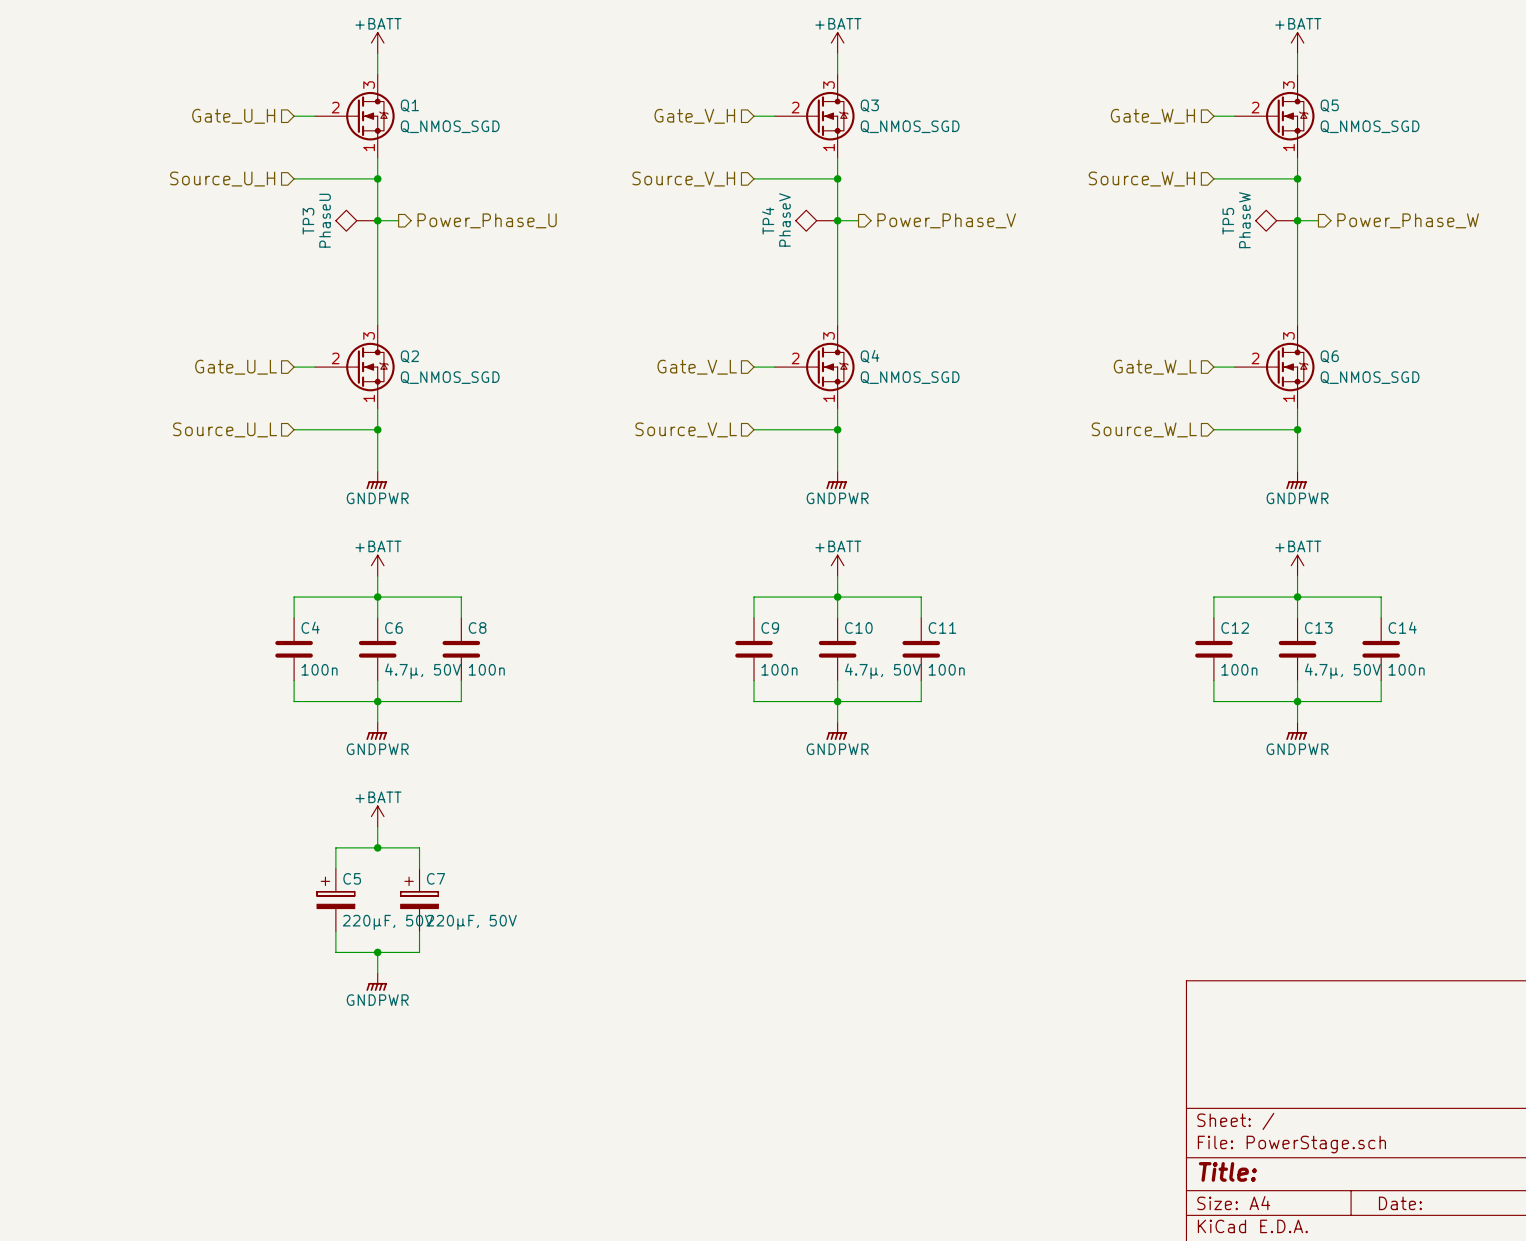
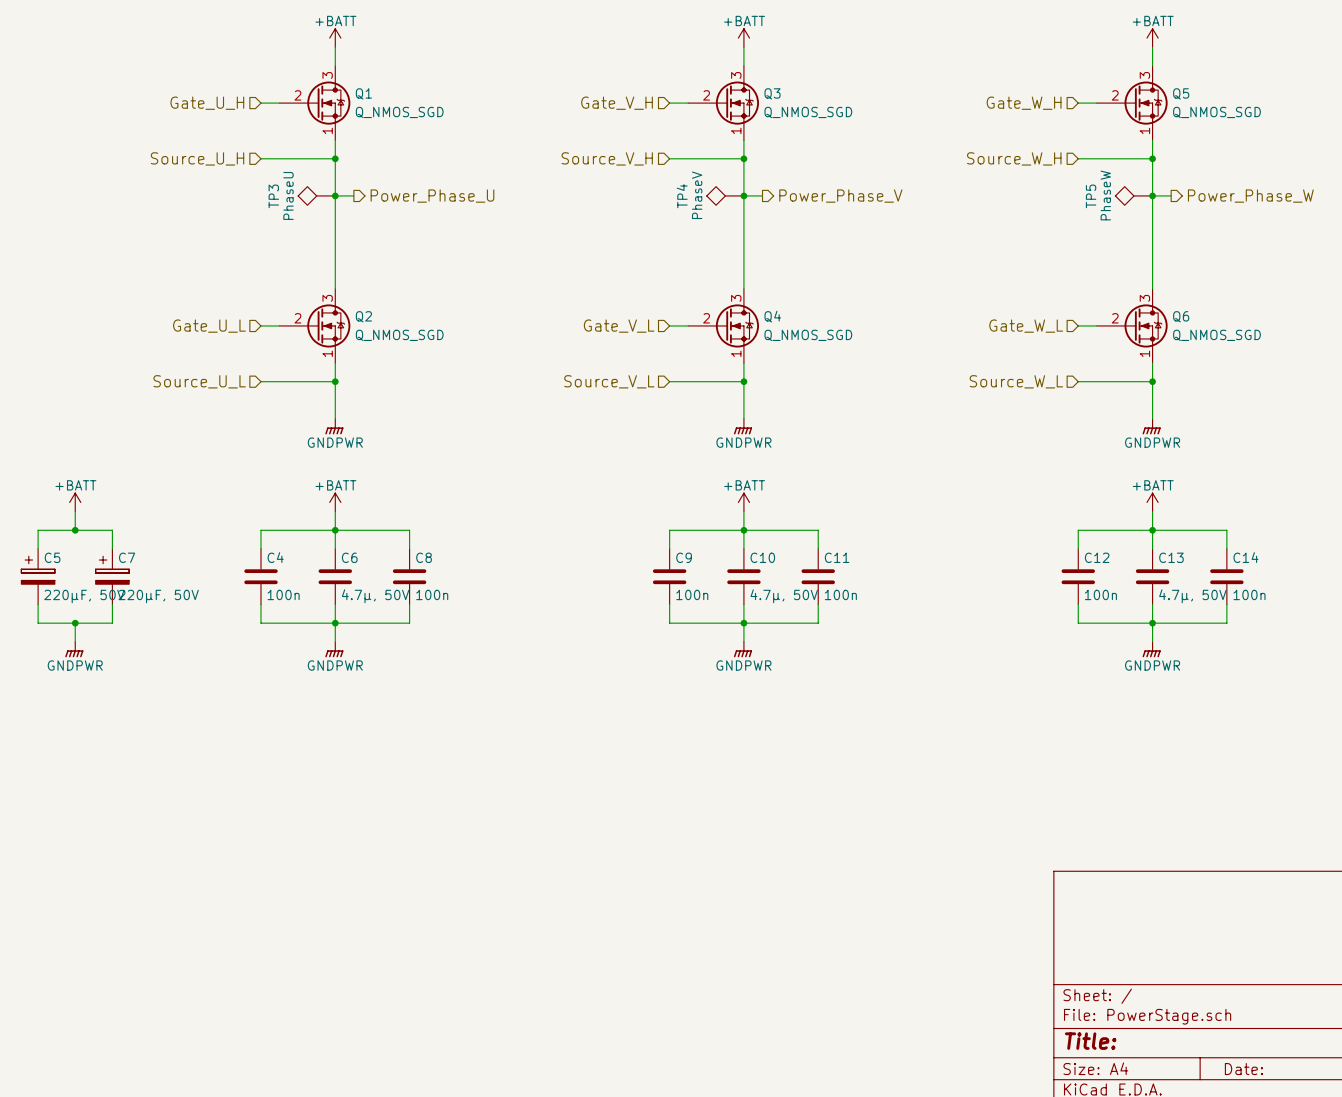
power symbol: none -> +BATT (75, 502)
wire: none -> (75, 511) (75, 530)
junction: none -> (75, 530)
wire: none -> (38, 548) (38, 530) (112, 530) (112, 548)
wire: none -> (38, 604) (38, 623) (112, 623) (112, 604)
wire: none -> (75, 623) (75, 641)
junction: none -> (75, 623)
power symbol: none -> GNDPWR (74, 649)
power symbol: +BATT (377, 816) -> none
wire: (377, 826) (377, 847) -> none
junction: (377, 847) -> none
wire: (335, 868) (335, 847) (419, 847) (419, 868) -> none
C5 position: (335, 900) -> (38, 576)
C7 position: (419, 900) -> (112, 576)
wire: (335, 931) (335, 952) (419, 952) (419, 931) -> none
wire: (377, 952) (377, 973) -> none
junction: (377, 952) -> none
power symbol: GNDPWR (376, 982) -> none

